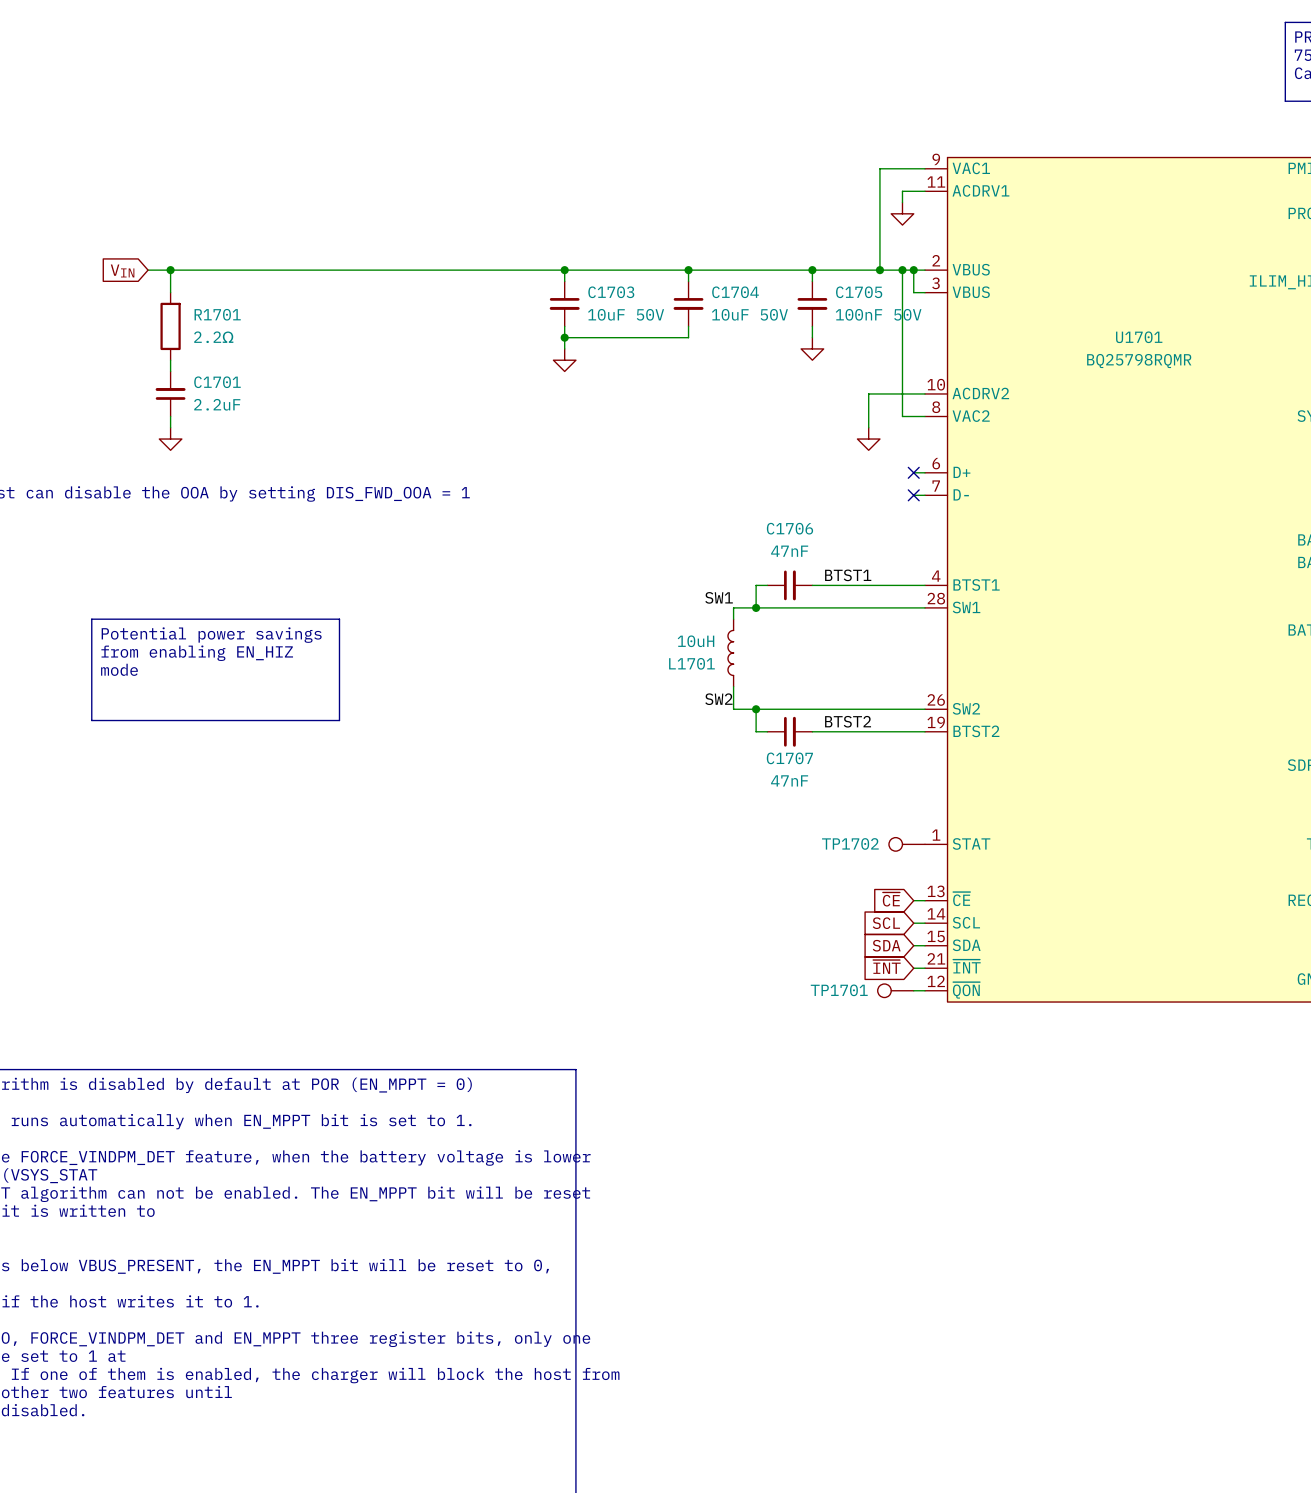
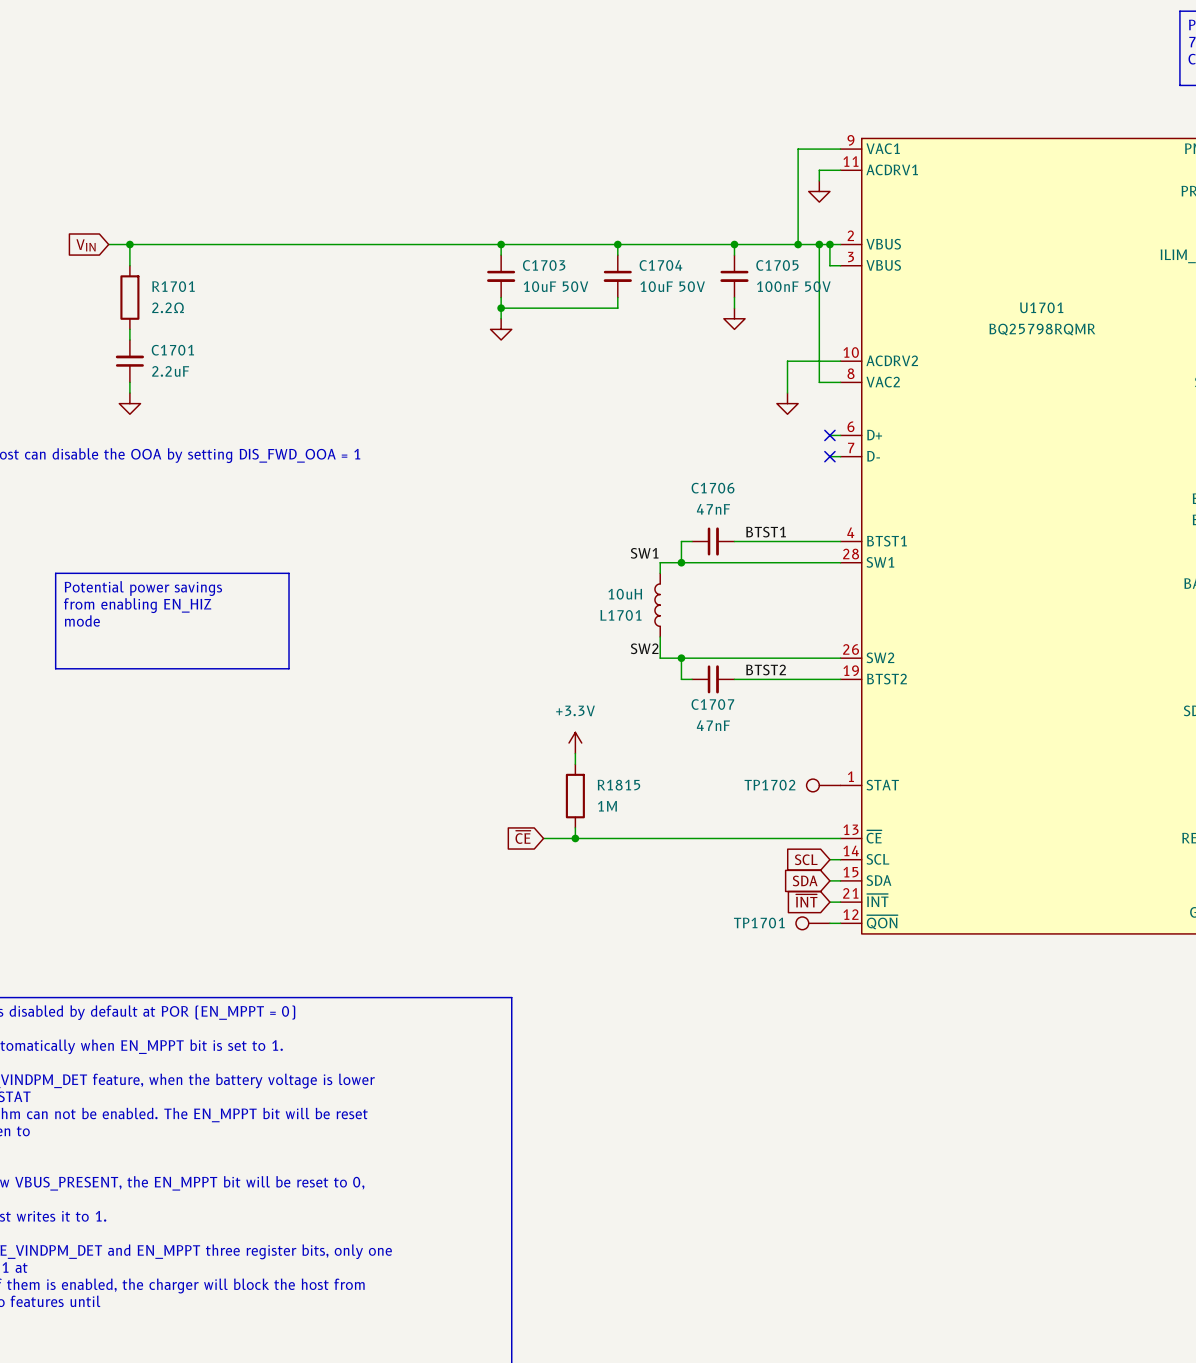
power symbol: none -> +3.3V (575, 743)
wire: none -> (575, 753) (575, 764)
R1815: none -> 1M (575, 796)
wire: none -> (575, 827) (575, 838)
global label: none -> ~{CE} (523, 837)
global label: ~{CE} (891, 899) -> none
wire: none -> (543, 838) (829, 838)
junction: none -> (575, 838)

